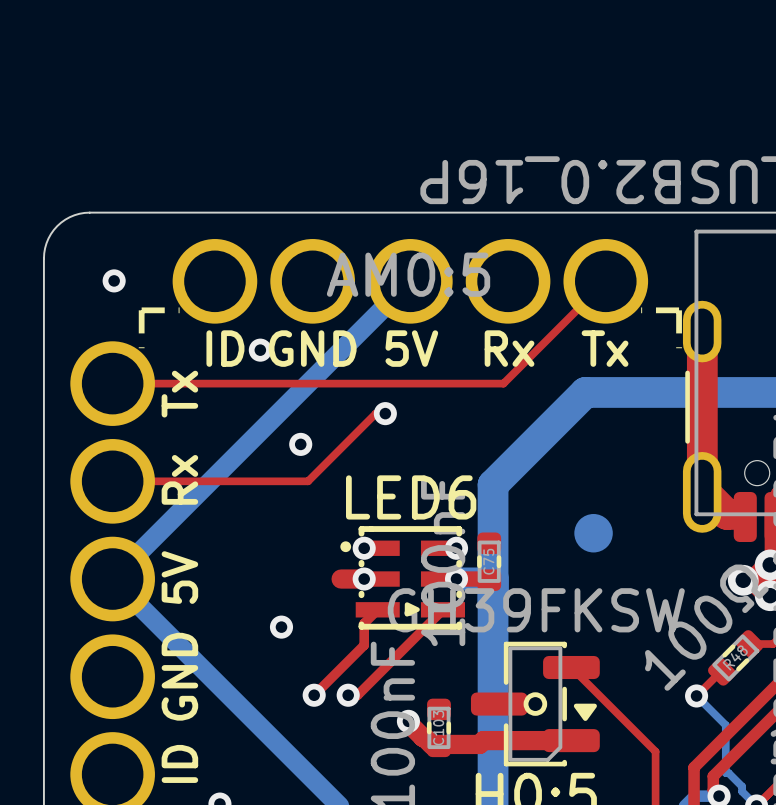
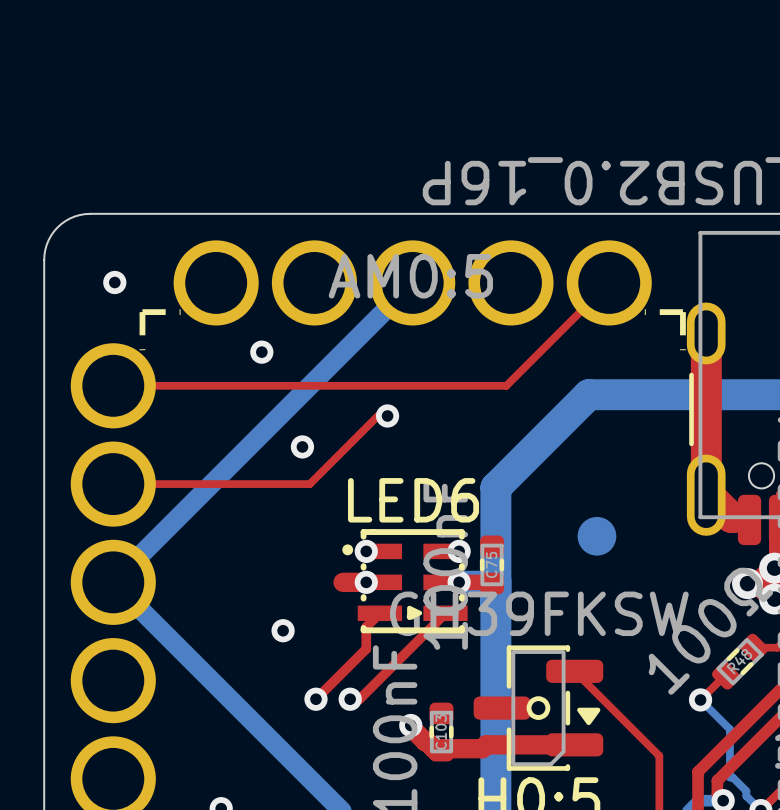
text: ID (225, 348) -> none
text: GND (312, 348) -> none
text: 5V (411, 348) -> none
text: Rx (509, 348) -> none
text: Tx (605, 348) -> none
text: Tx (179, 394) -> none
text: Rx (179, 479) -> none
text: 5V (179, 577) -> none
text: GND (179, 676) -> none
text: ID (179, 763) -> none

